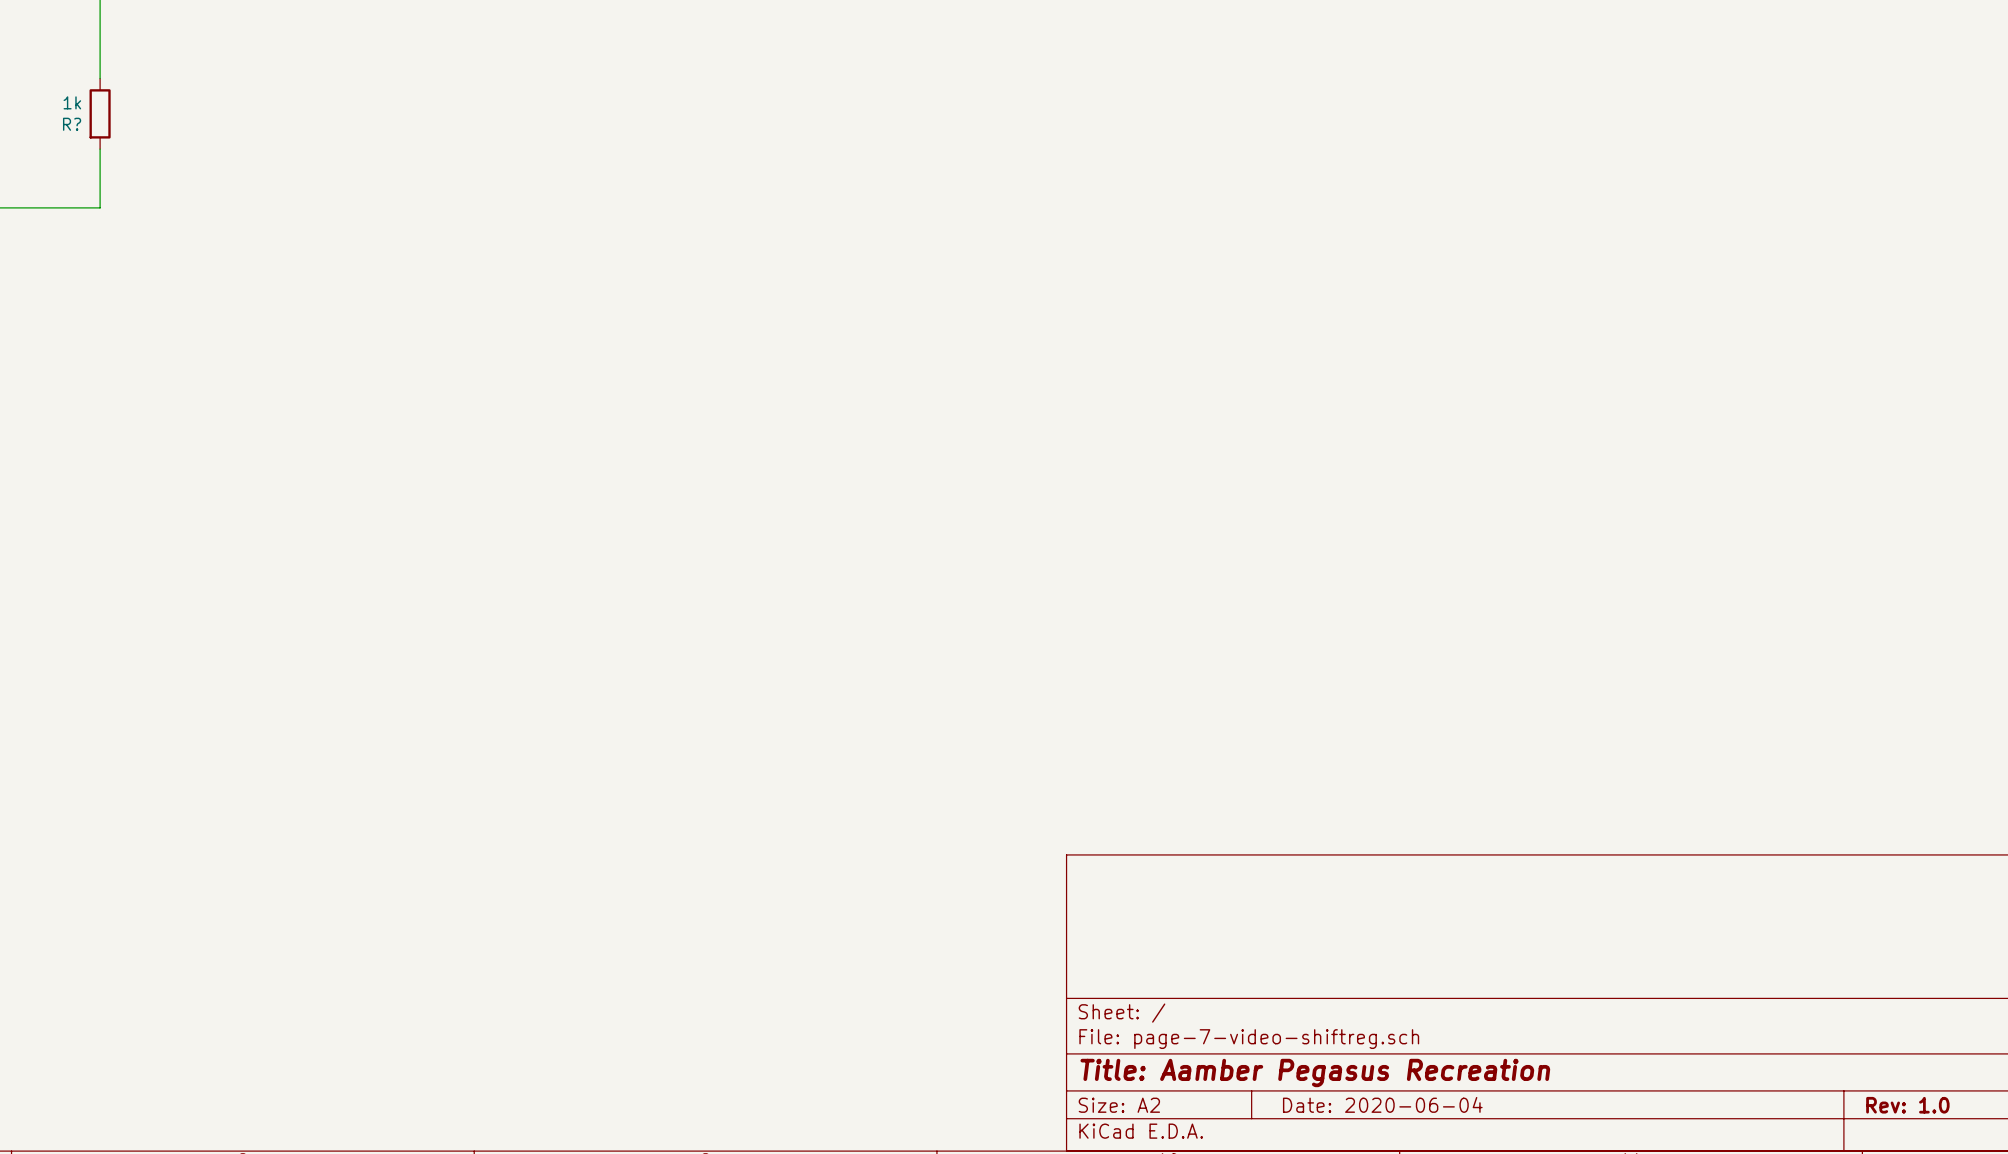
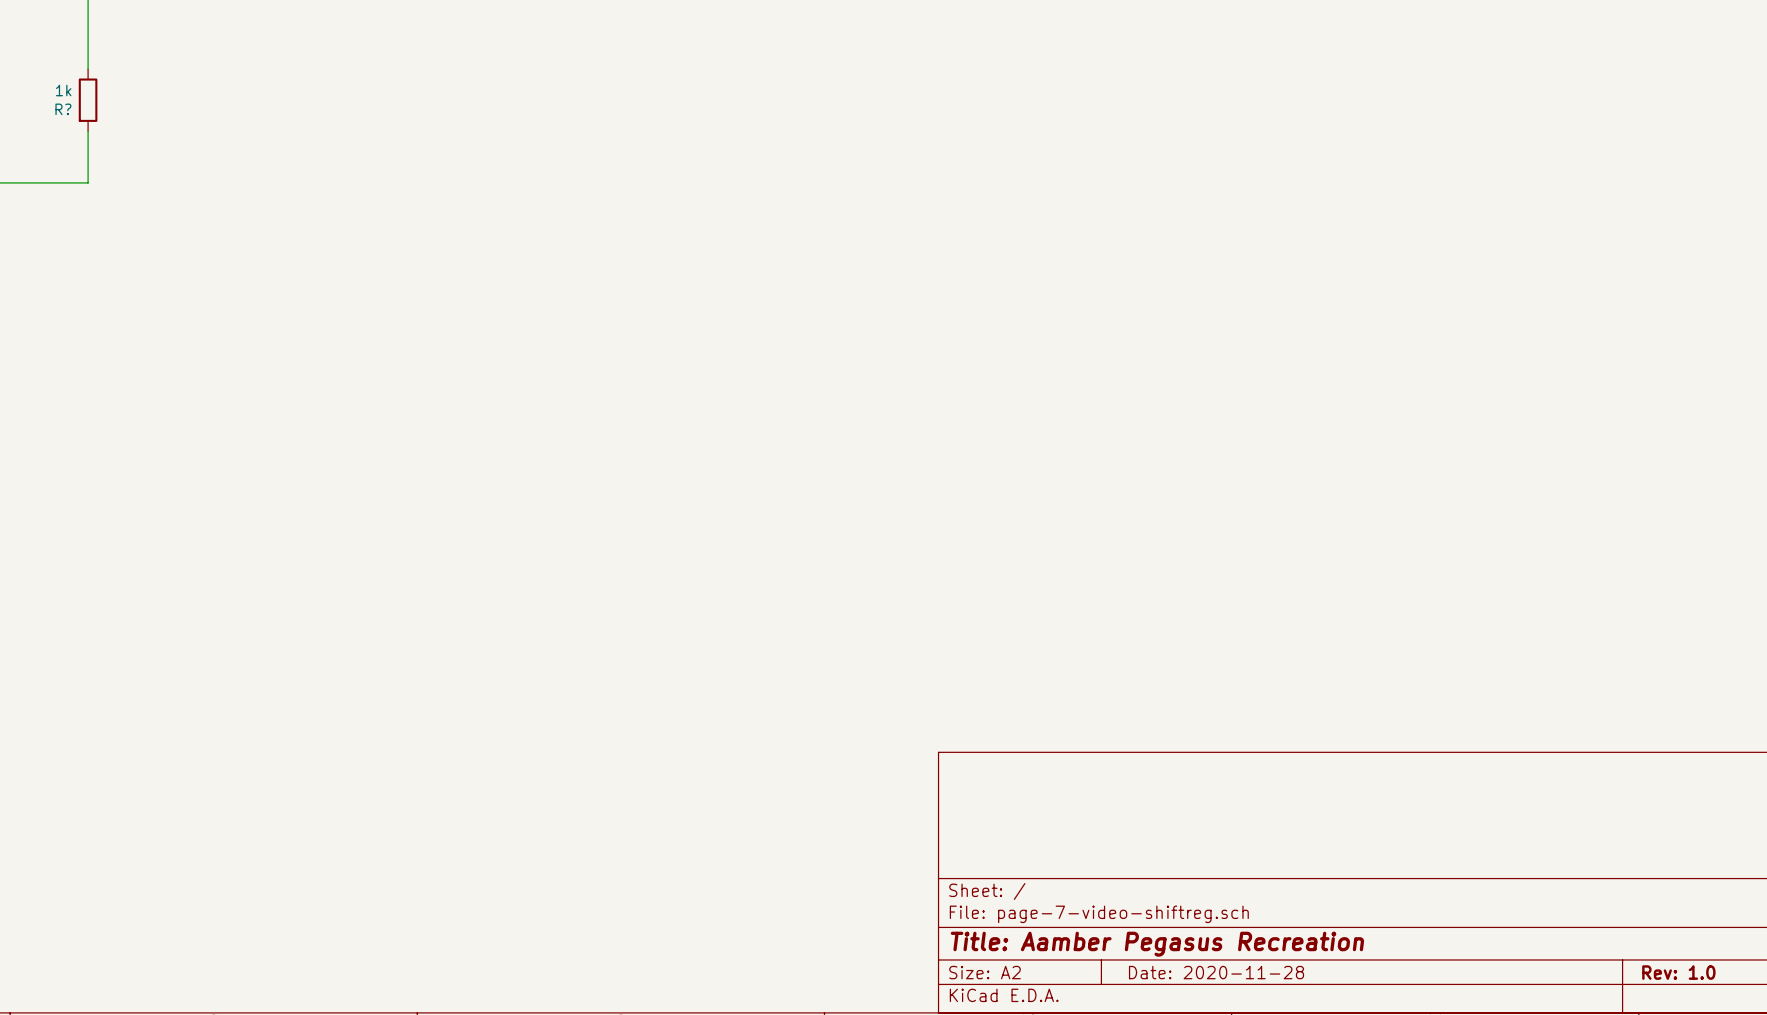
title block: Date: 2020-06-04 (1382, 1104) -> Date: 2020-11-28 (1216, 972)

